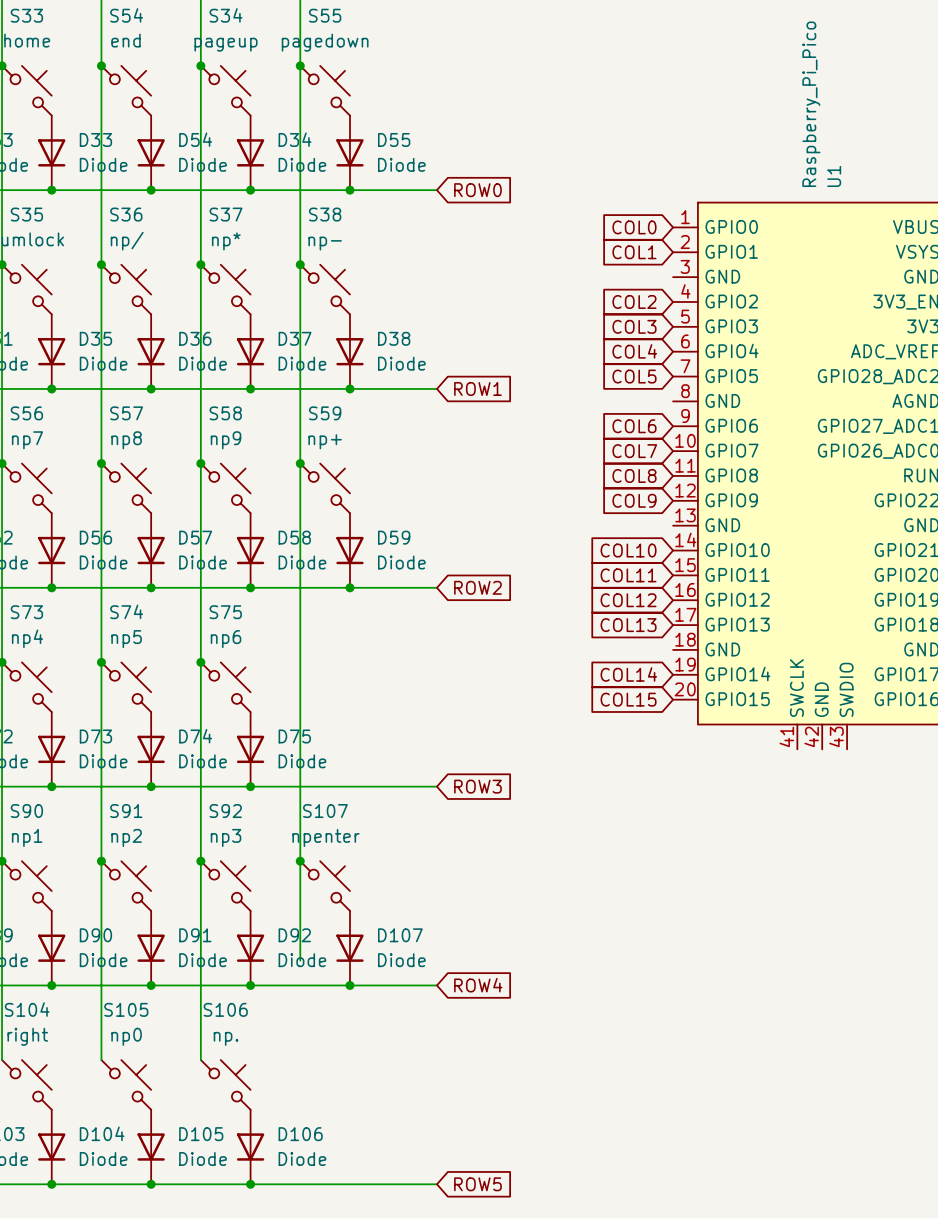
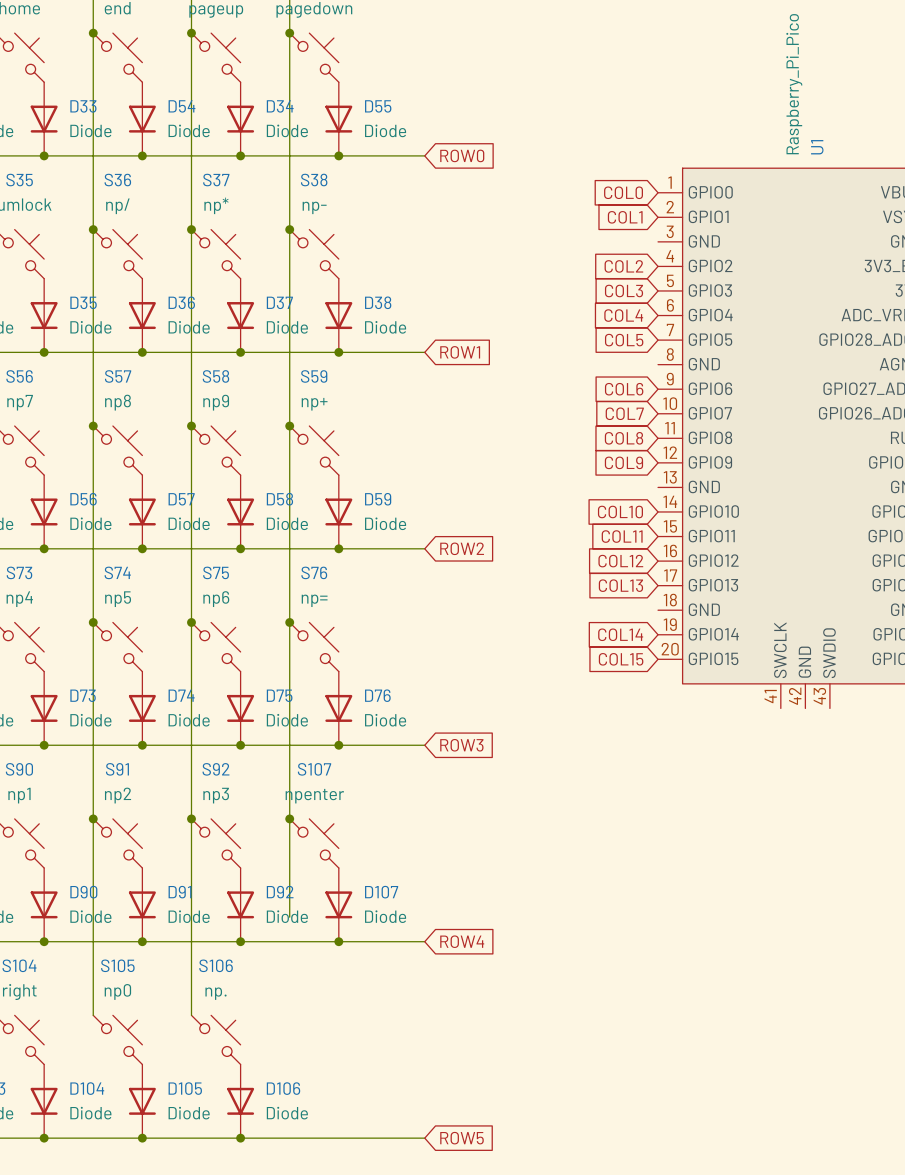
junction: none -> (289, 622)
S76: none -> np= (314, 647)
D76: none -> Diode (338, 708)
junction: none -> (338, 745)

